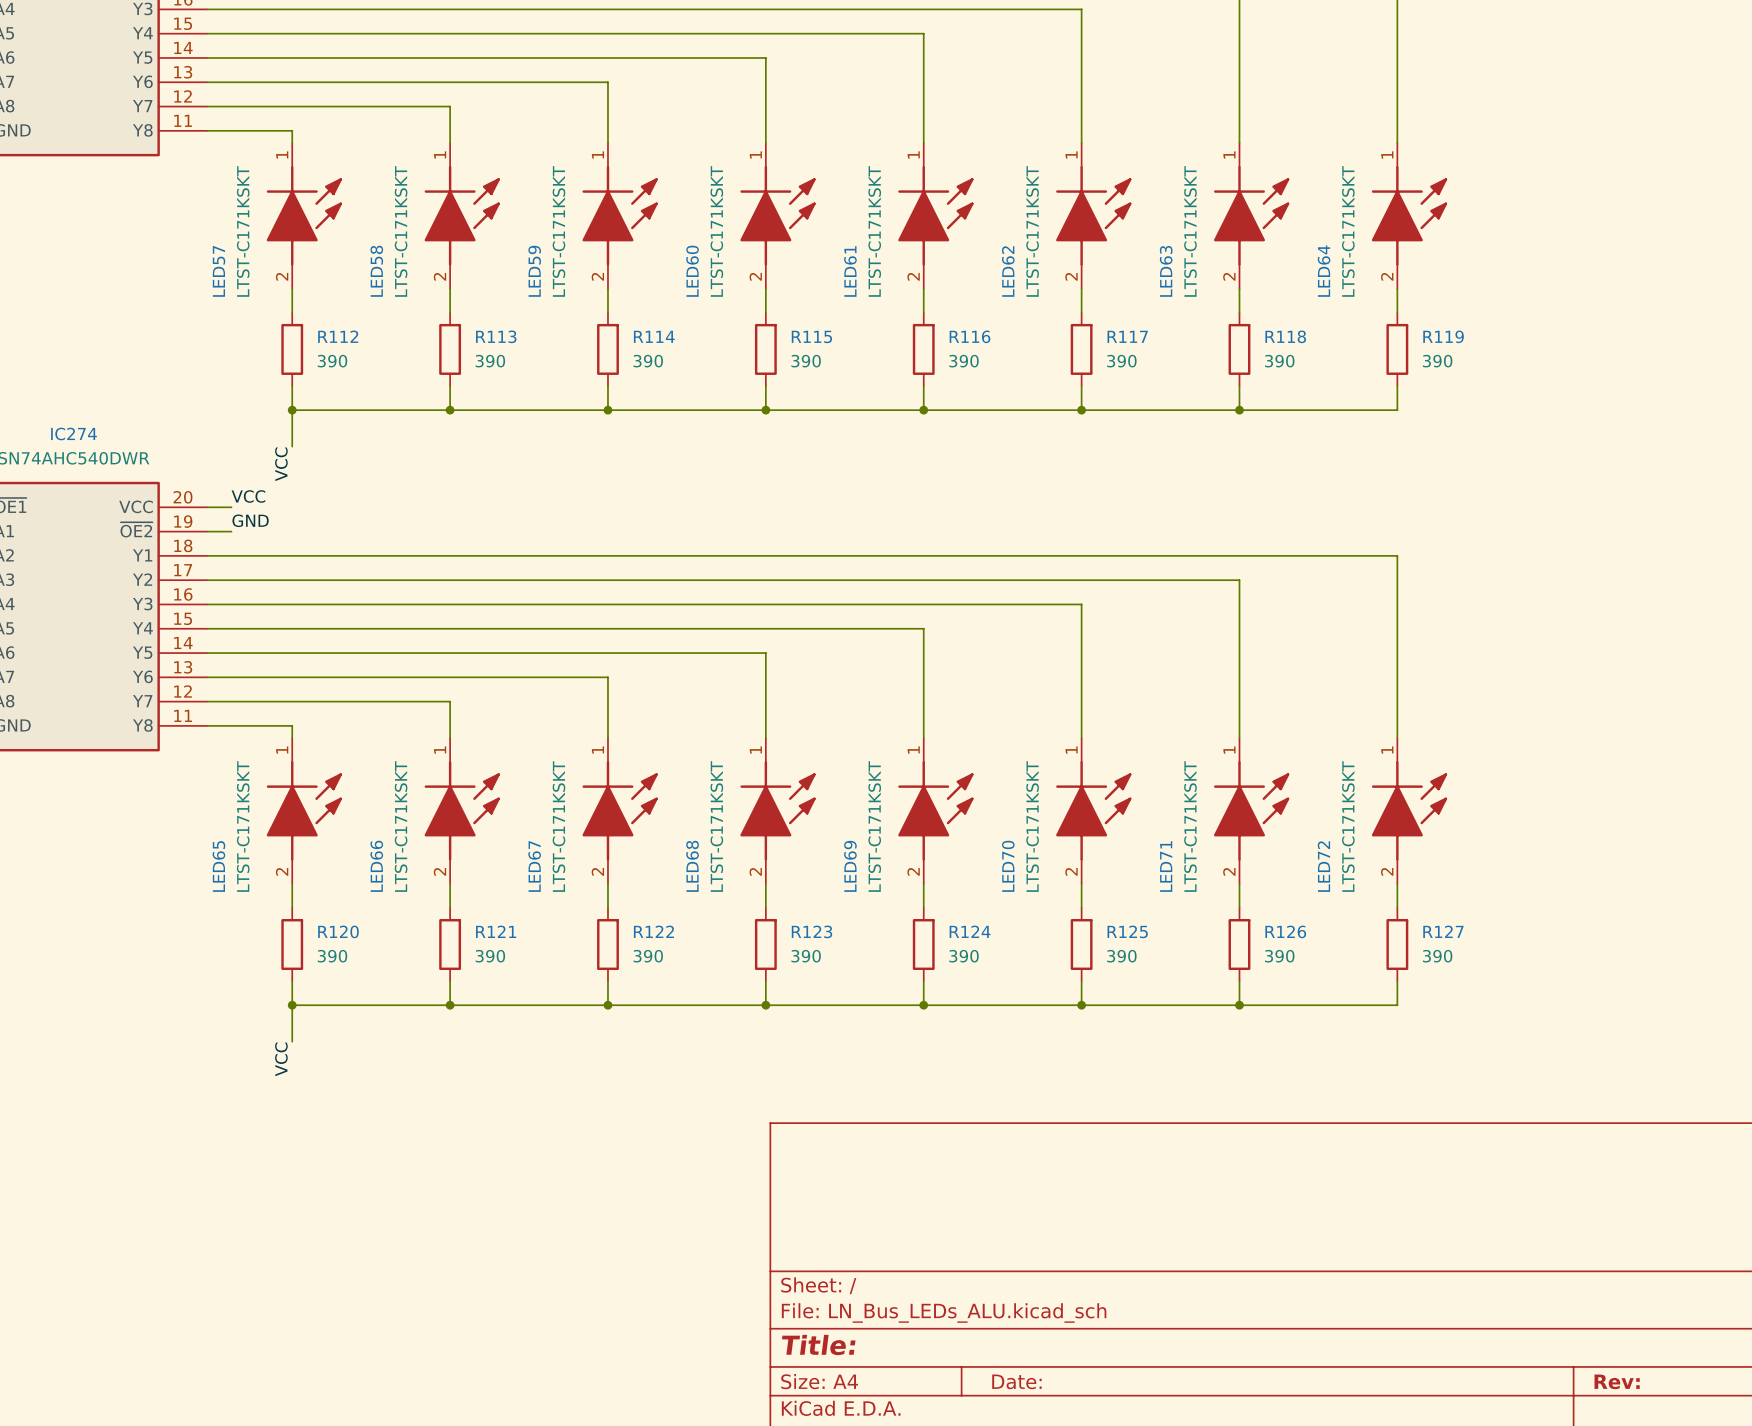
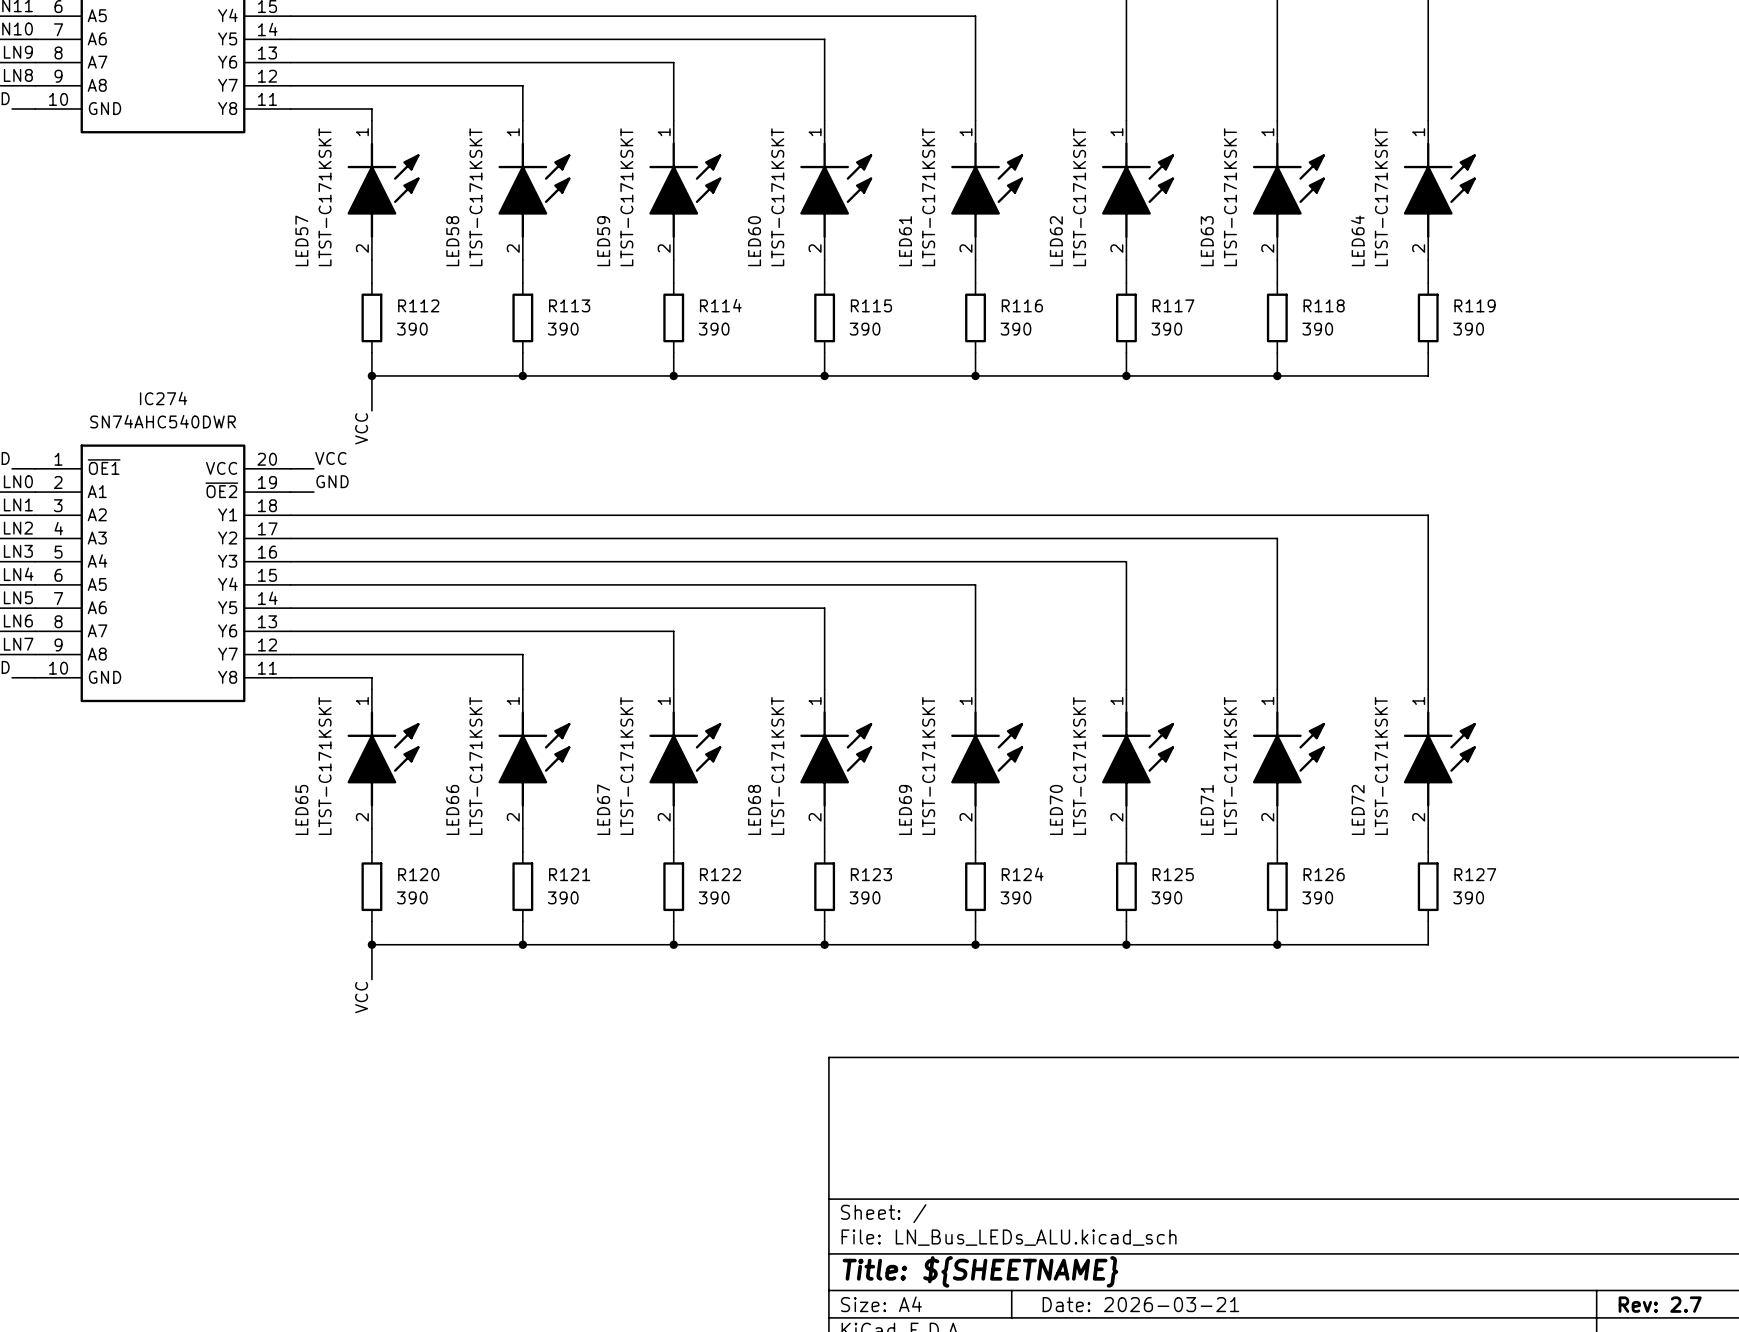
title block: Title: (818, 1345) -> Title: ${SHEETNAME} (980, 1271)
title block: Date: (1016, 1381) -> Date: 2026-03-21 (1140, 1304)
title block: Rev: (1617, 1381) -> Rev: 2.7 (1660, 1304)

